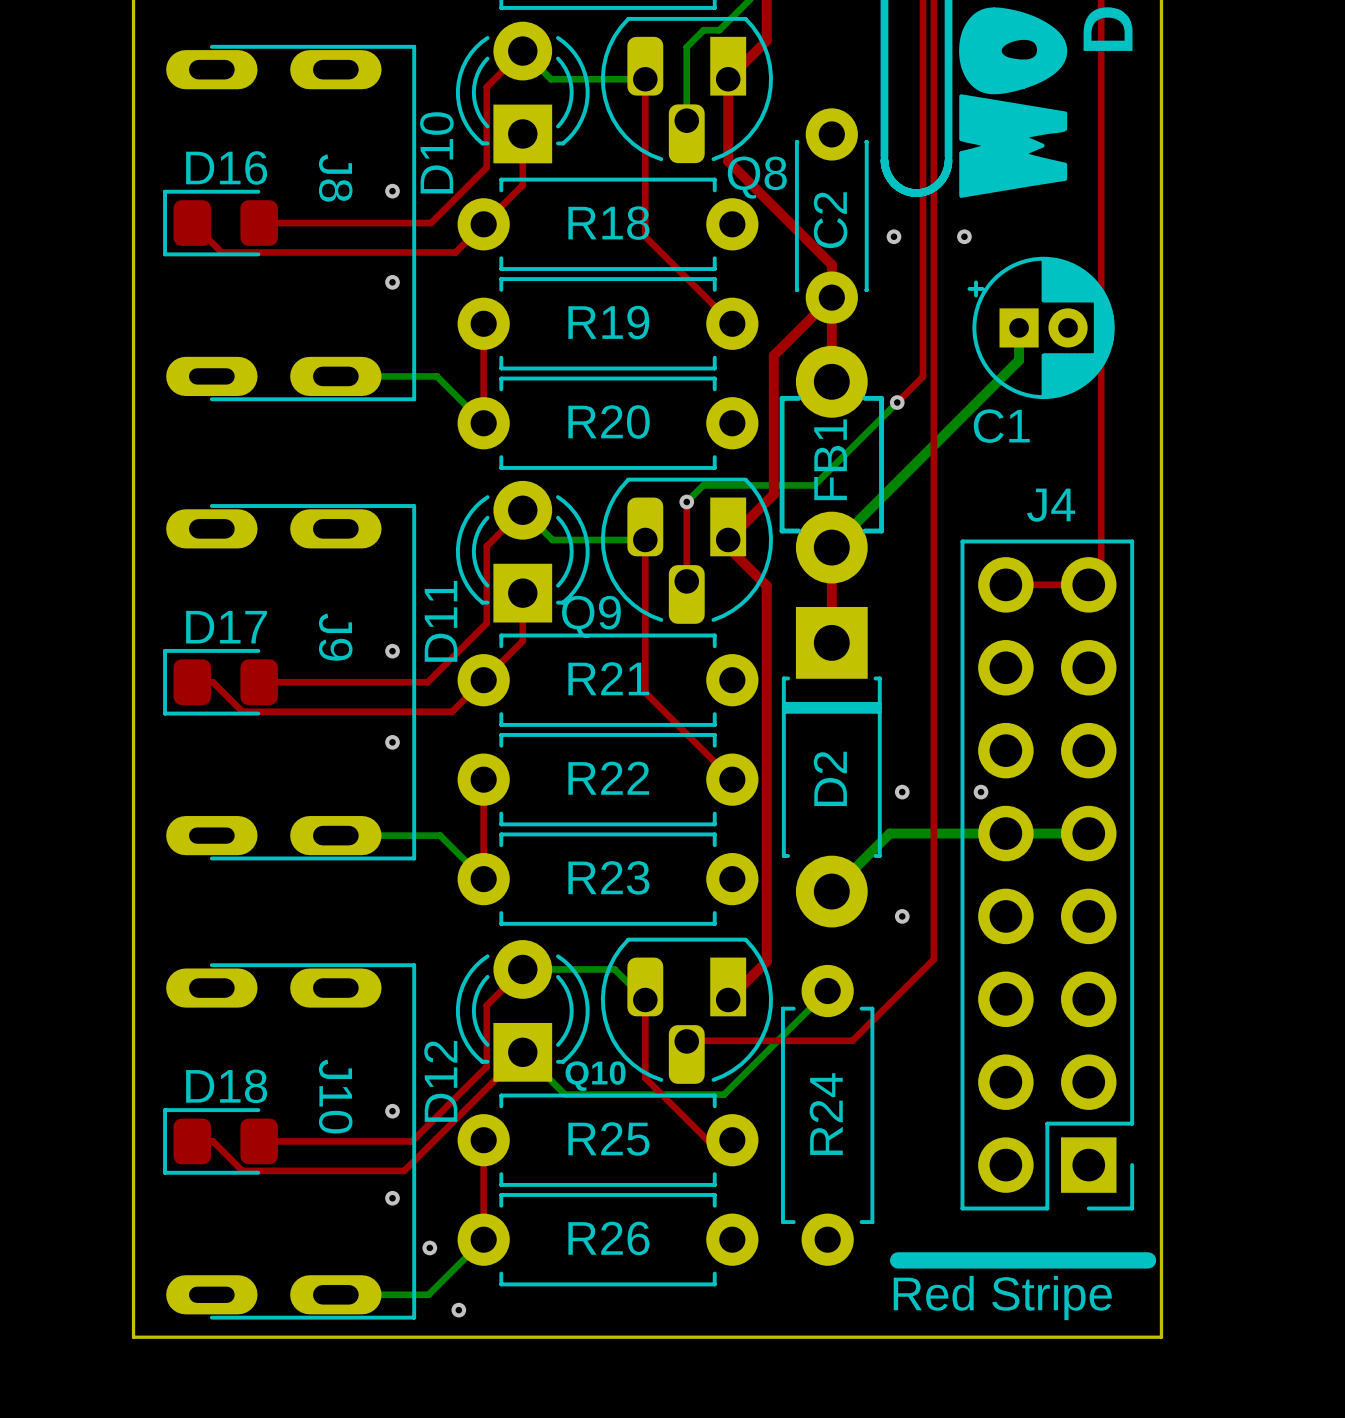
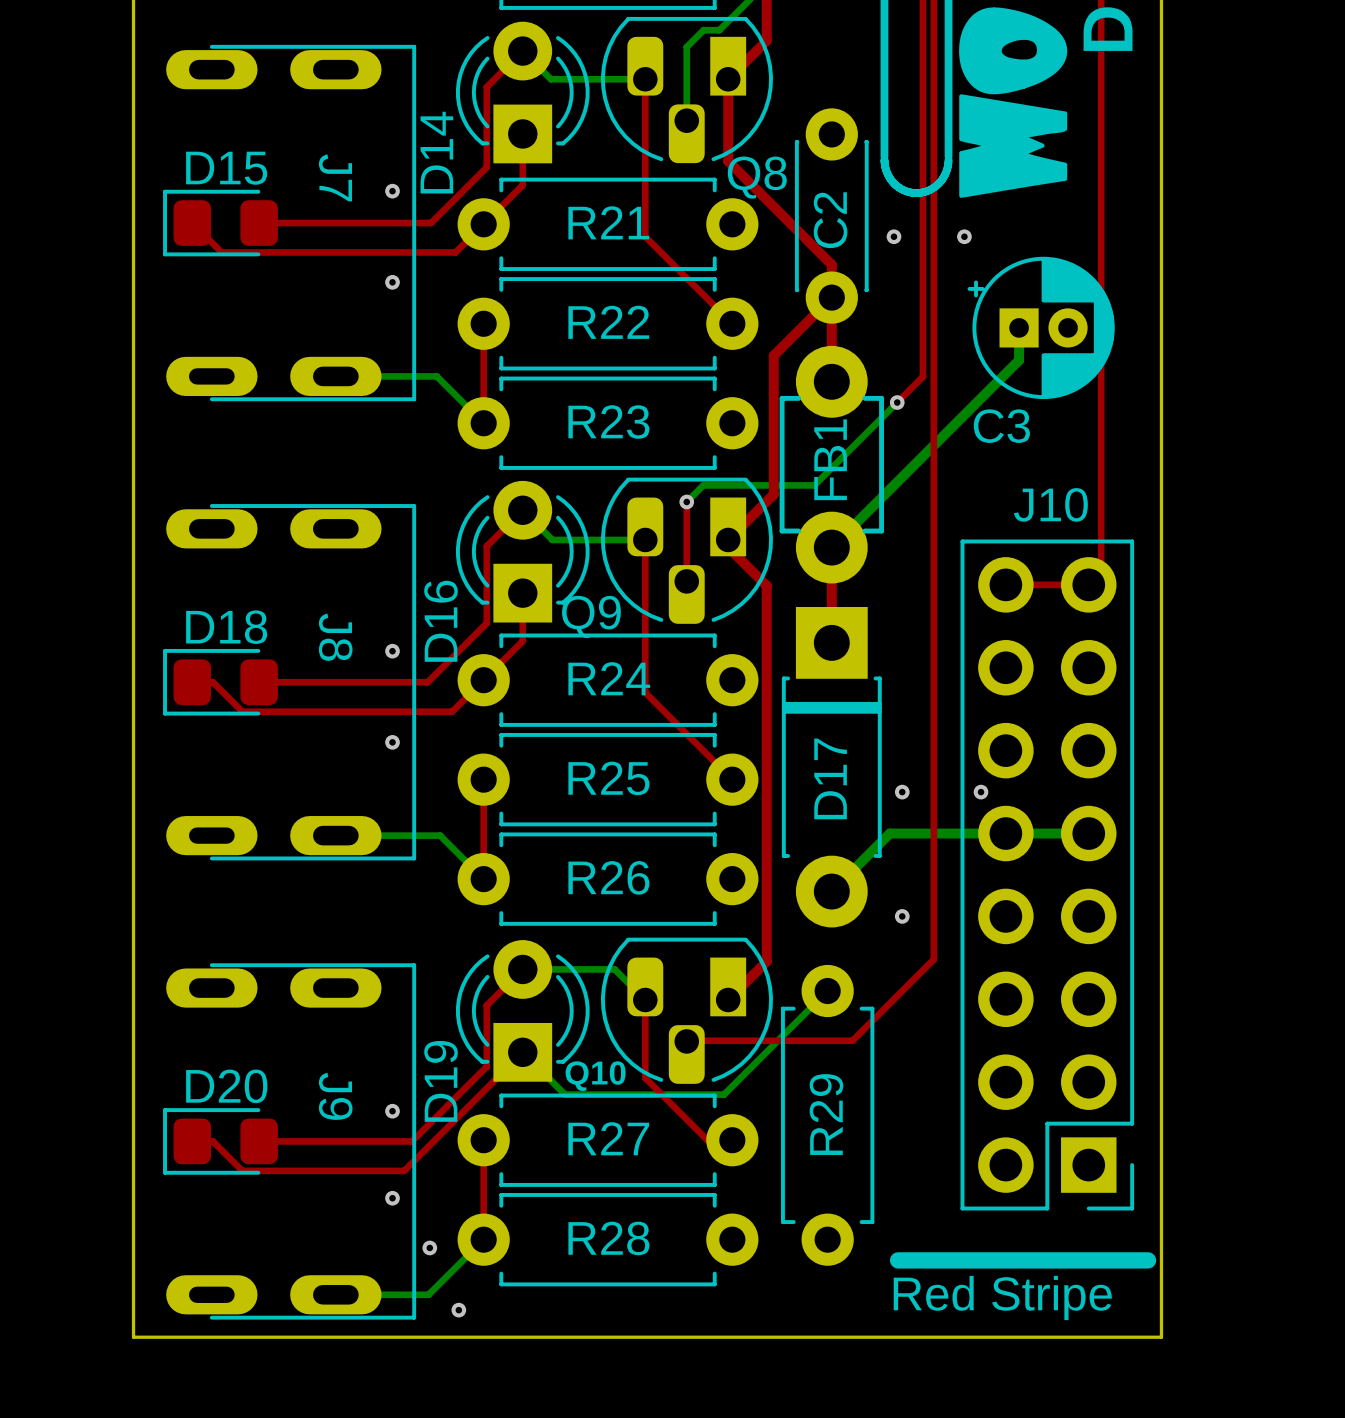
D10 name: D10 (436, 152) -> D14 (436, 152)
D16 name: D16 (226, 167) -> D15 (226, 168)
J8 name: J8 (335, 178) -> J7 (335, 177)
R18 name: R18 (608, 223) -> R21 (608, 222)
R19 name: R19 (608, 322) -> R22 (608, 322)
R20 name: R20 (609, 422) -> R23 (608, 422)
C1 name: C1 (1001, 426) -> C3 (1001, 426)
J4 name: J4 (1051, 505) -> J10 (1050, 504)
D11 name: D11 (441, 621) -> D16 (441, 621)
D17 name: D17 (226, 627) -> D18 (226, 627)
J9 name: J9 (335, 637) -> J8 (335, 637)
R21 name: R21 (608, 678) -> R24 (609, 678)
R22 name: R22 (608, 778) -> R25 (608, 778)
D2 name: D2 (830, 778) -> D17 (830, 778)
R23 name: R23 (608, 877) -> R26 (608, 877)
D12 name: D12 (440, 1081) -> D19 (441, 1081)
D18 name: D18 (226, 1086) -> D20 (226, 1086)
J10 name: J10 (335, 1096) -> J9 (335, 1096)
R24 name: R24 (826, 1114) -> R29 (826, 1114)
R25 name: R25 (608, 1138) -> R27 (608, 1138)
R26 name: R26 (608, 1238) -> R28 (608, 1238)

